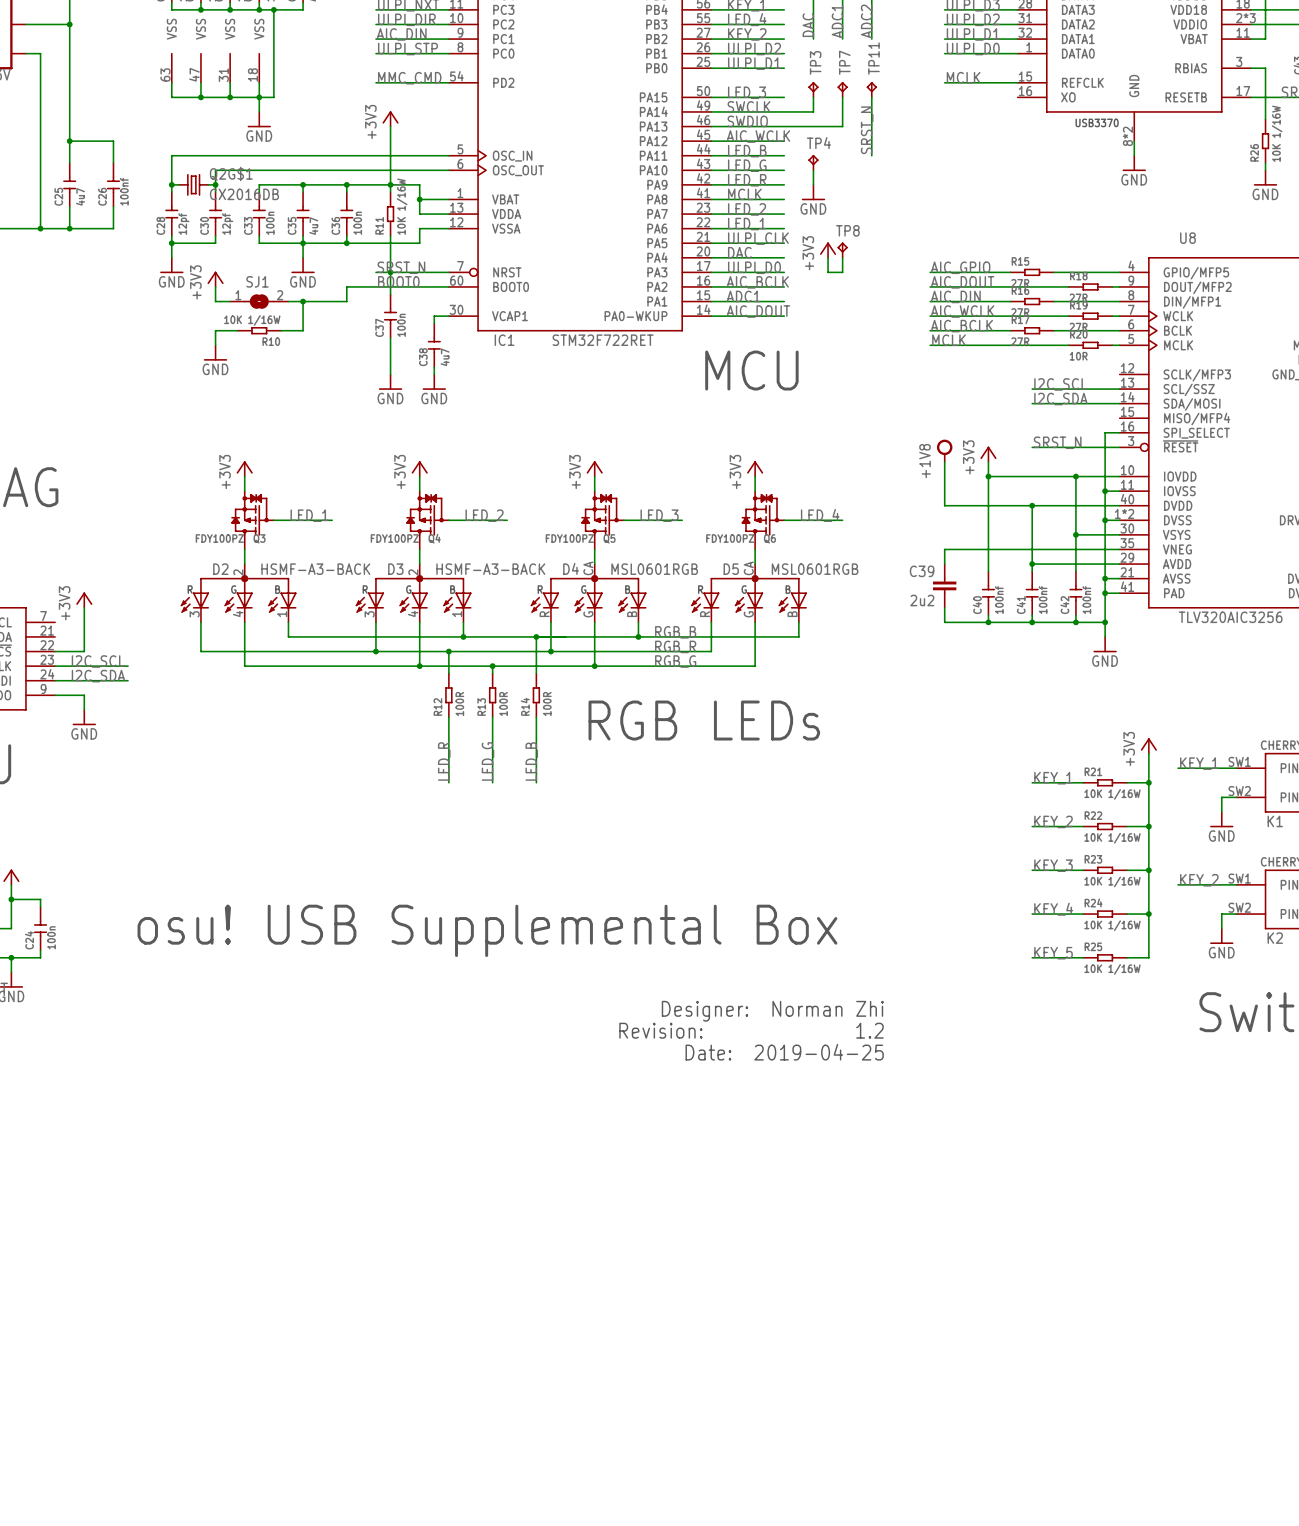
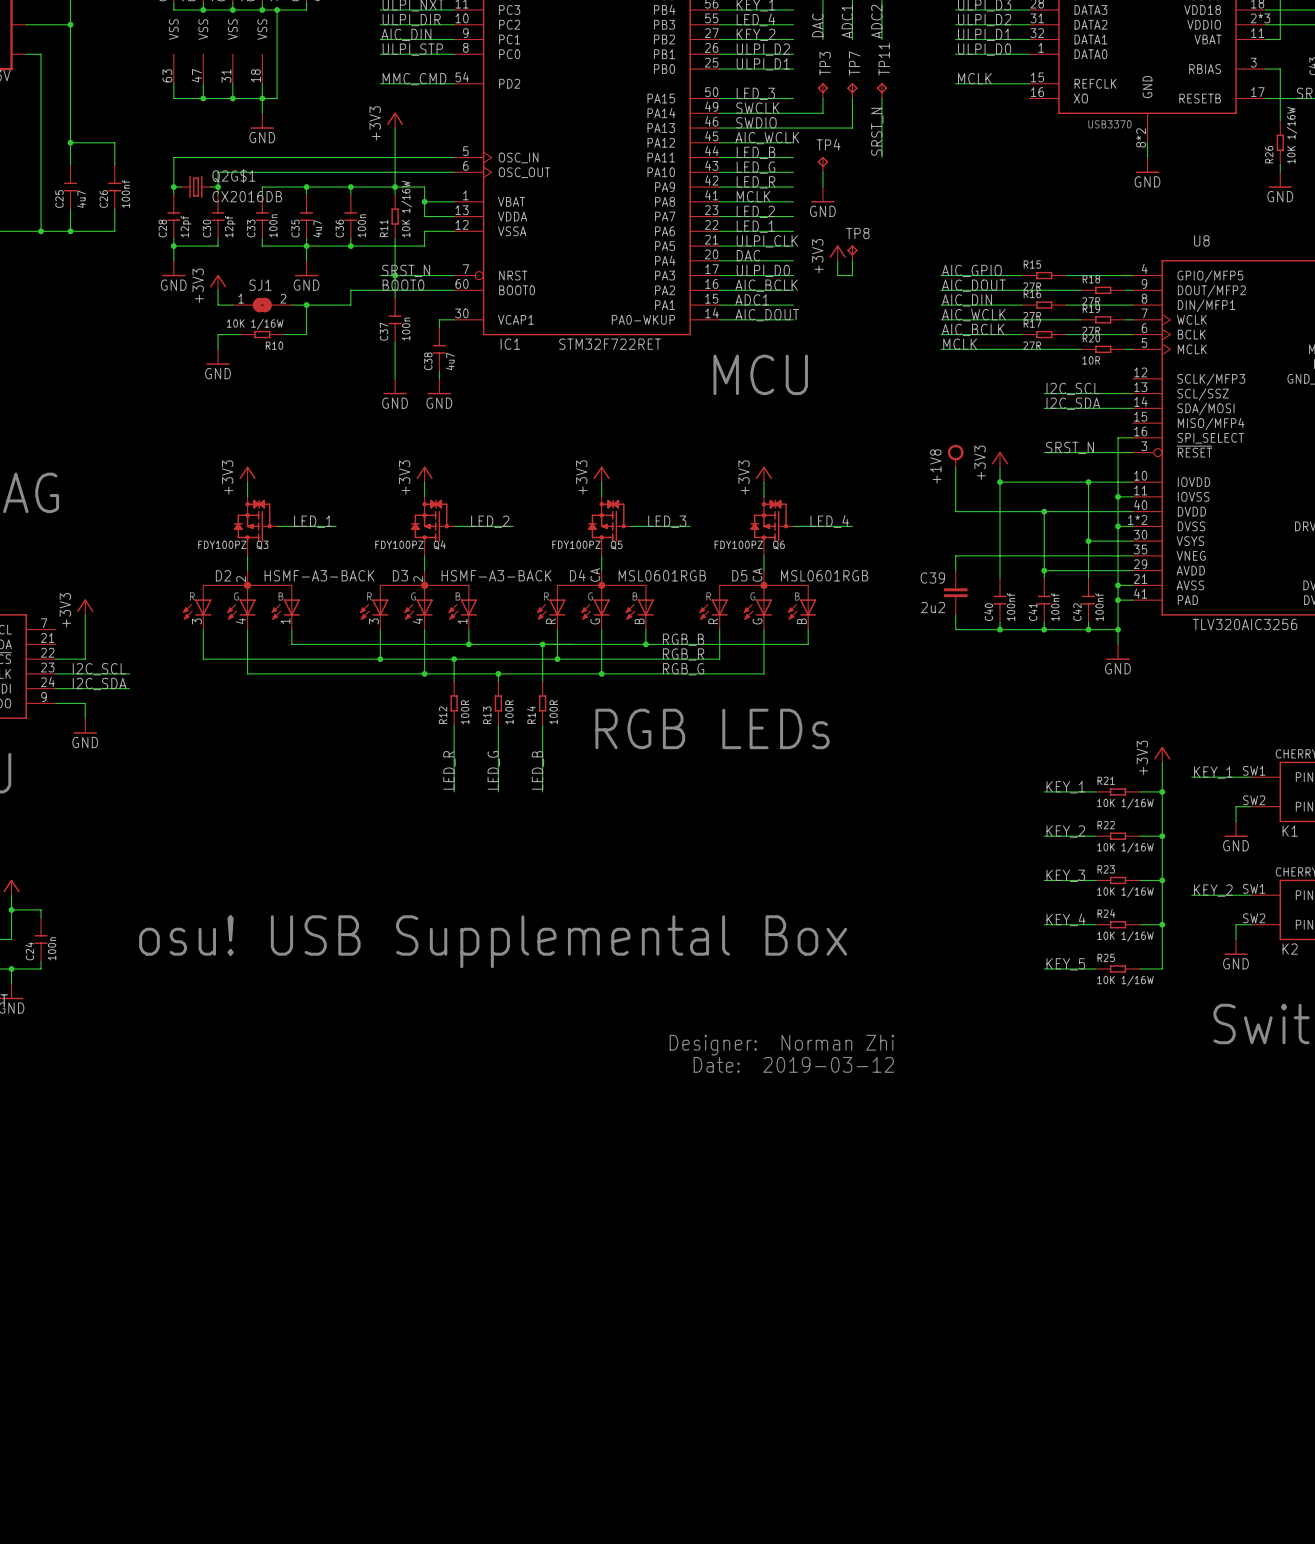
text: Designer: Norman Zhi (772, 1011) -> none
text: Revision: 1.2 (751, 1030) -> Designer: Norman Zhi (781, 1045)
text: Date: 2019-04-25 (784, 1052) -> Date: 2019-03-12 (793, 1064)

